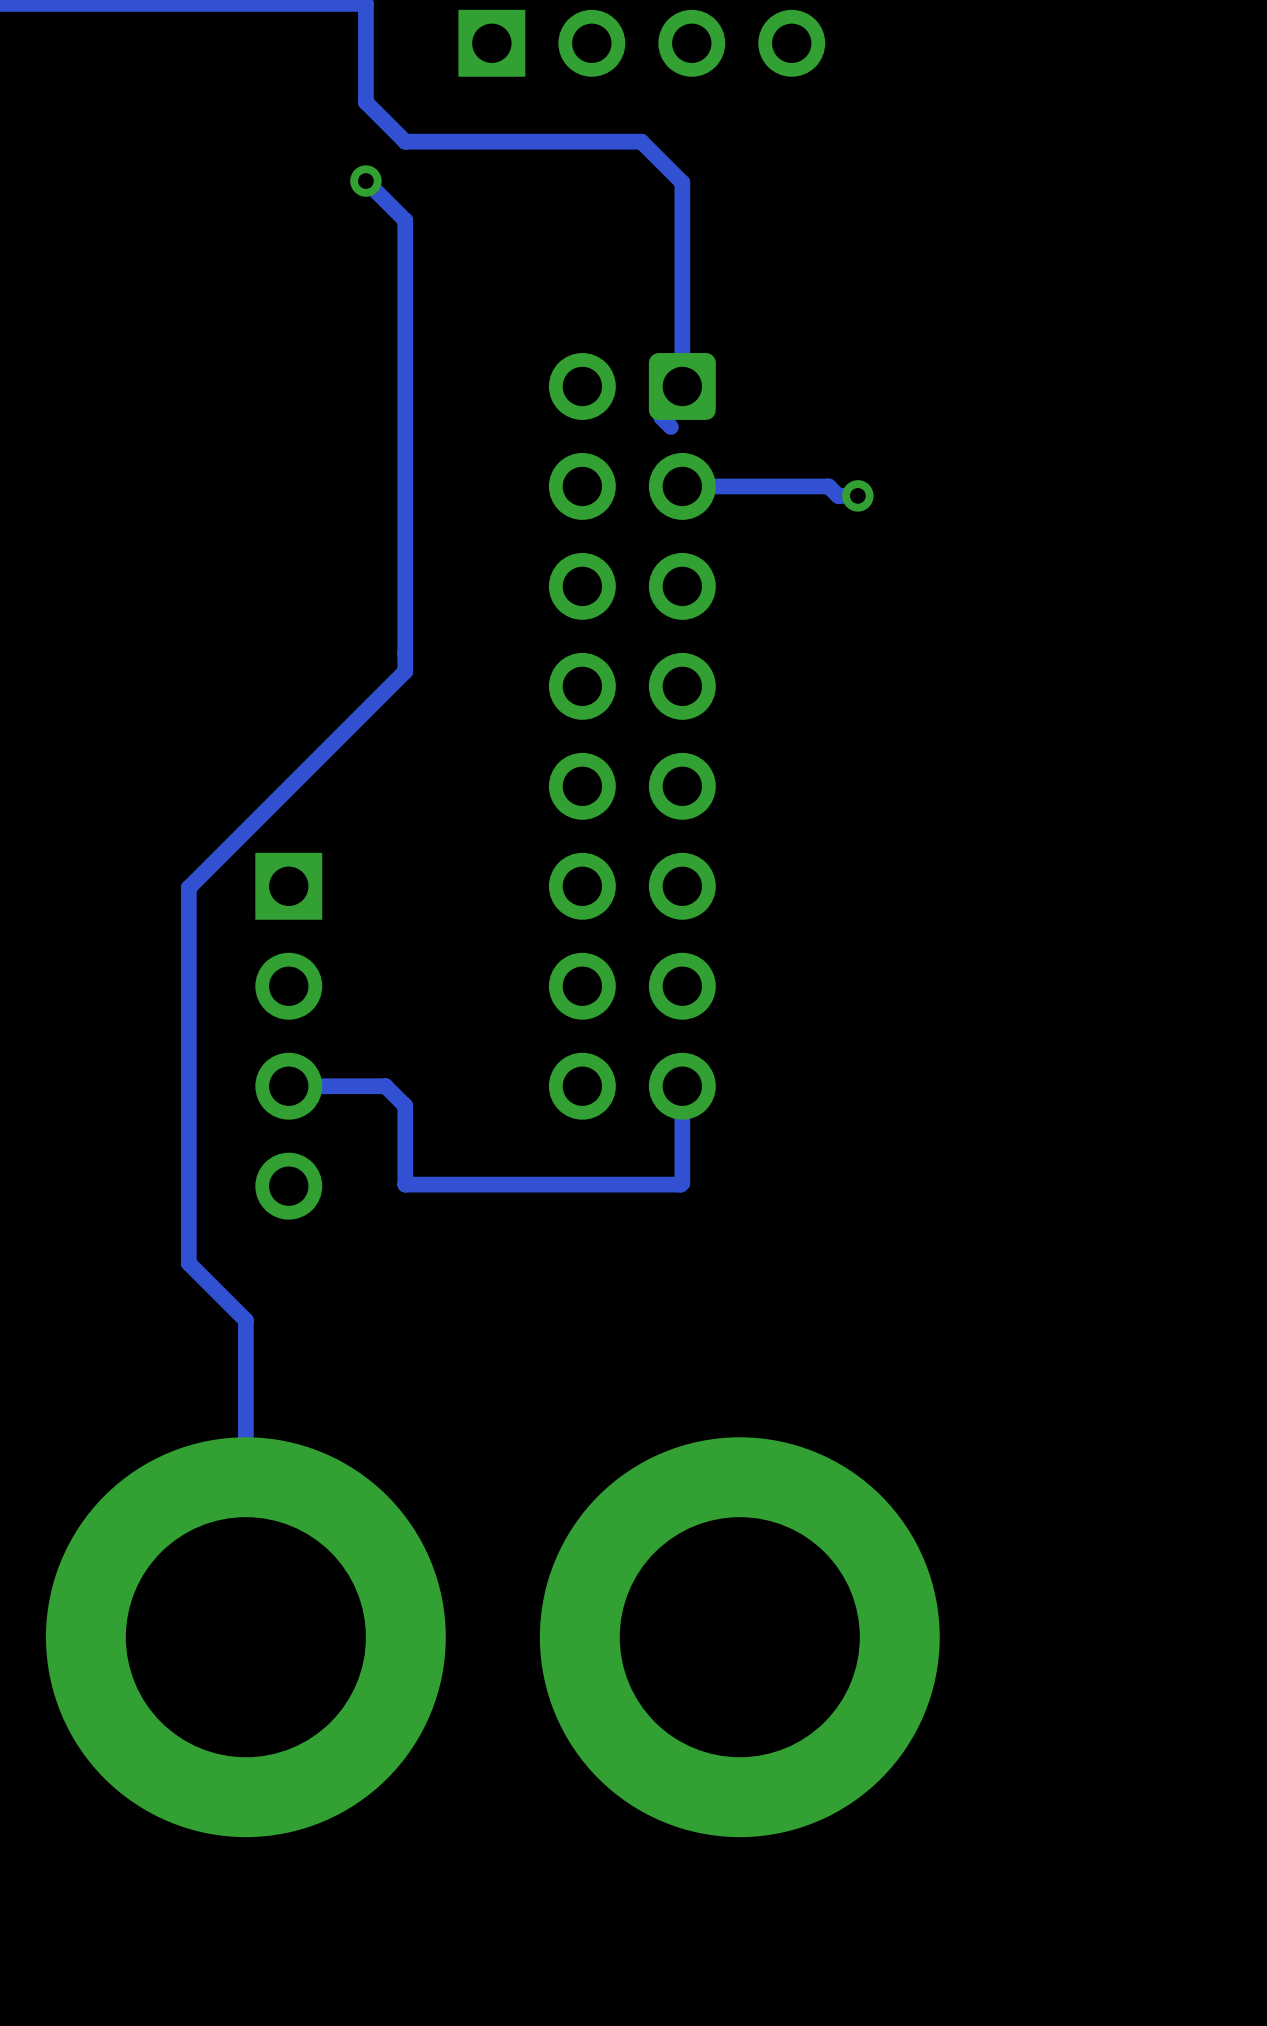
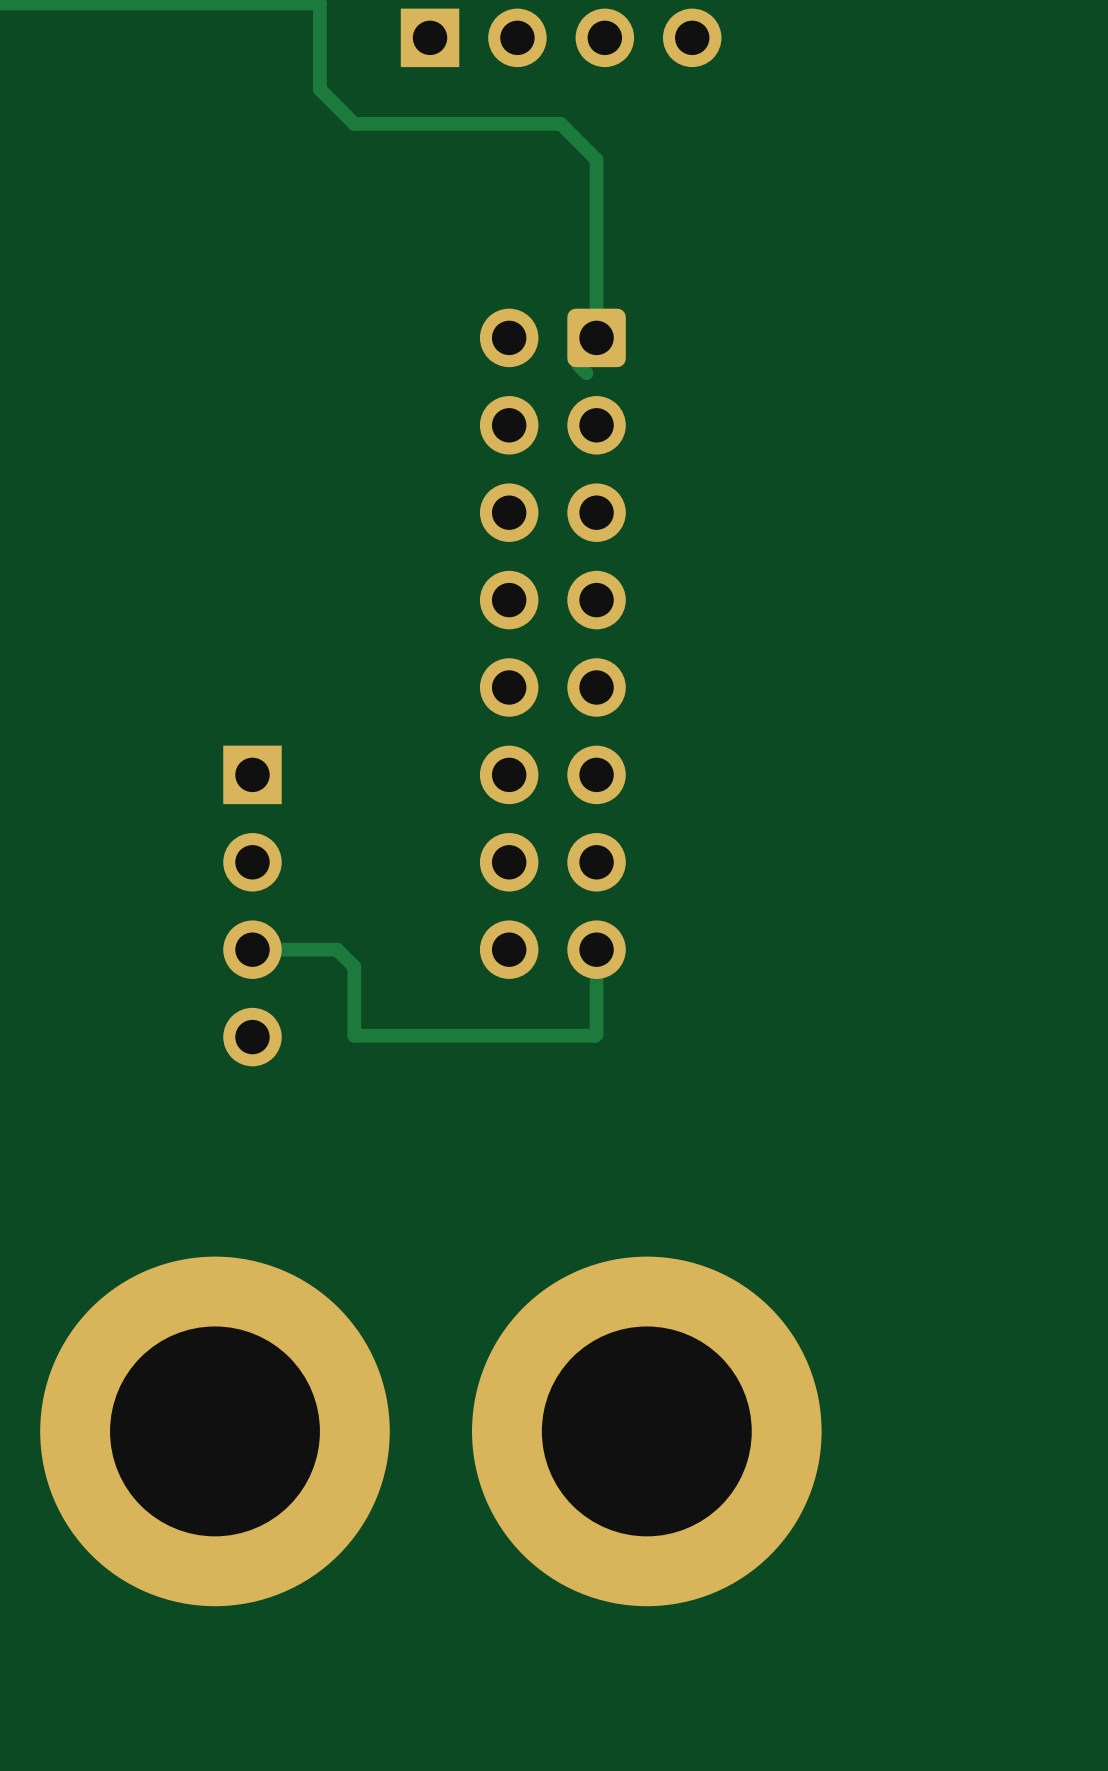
track: (365, 181) (405, 220) (405, 671) (188, 887) (188, 1263) (245, 1320) (245, 1637) -> none
via: (365, 181) -> none
track: (682, 486) (828, 486) (838, 495) (857, 495) -> none
via: (857, 495) -> none

